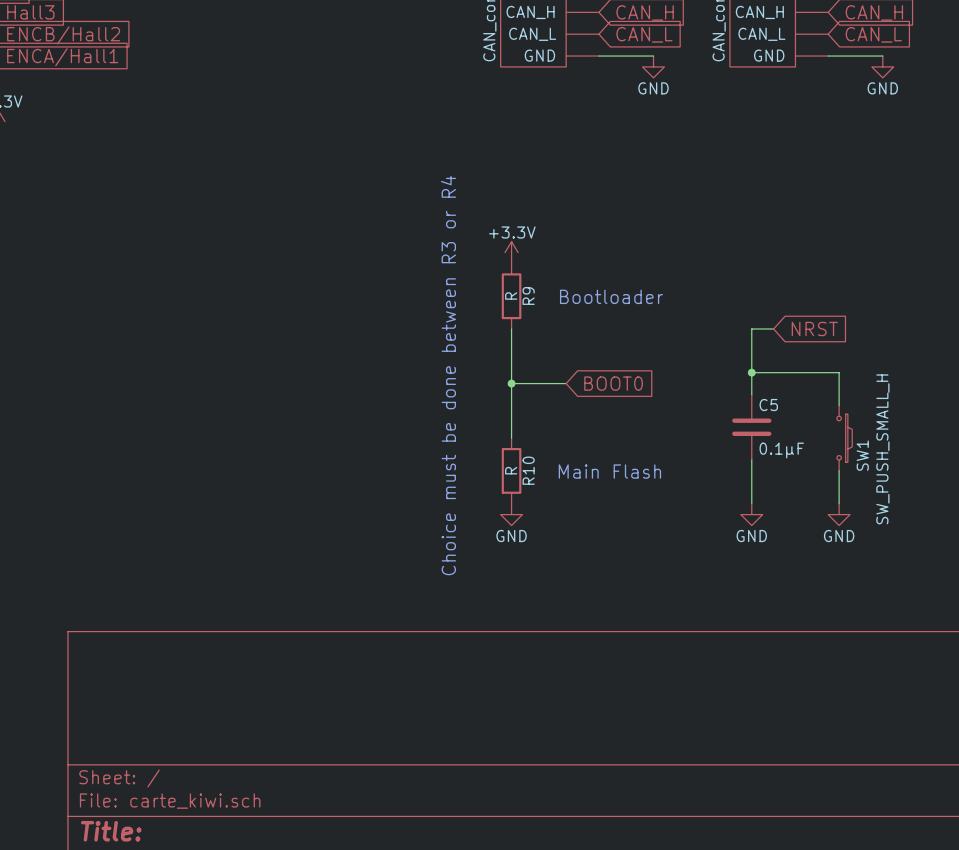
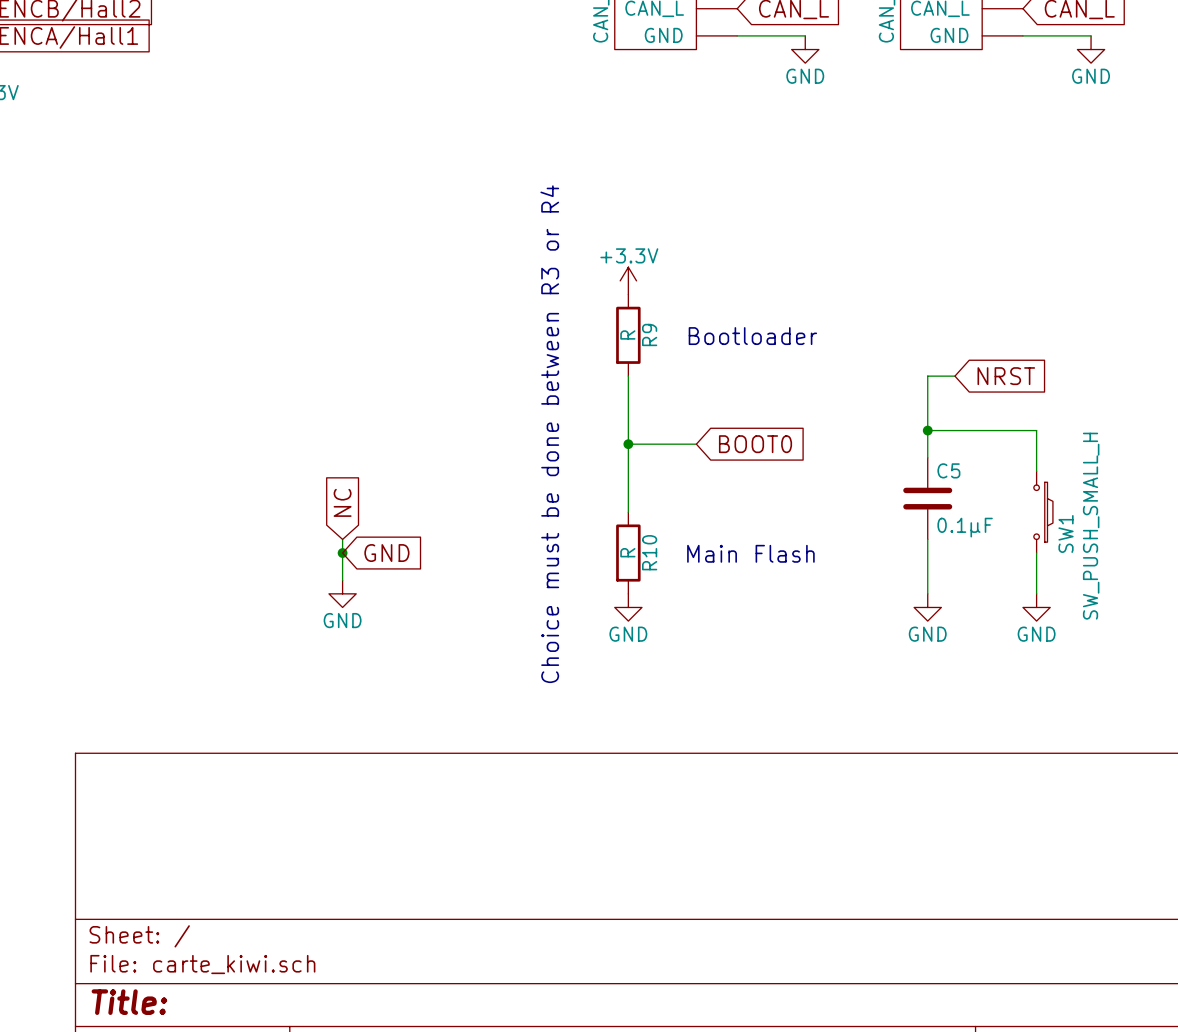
global label: none -> NC (342, 502)
wire: none -> (342, 539) (342, 580)
junction: none -> (342, 553)
global label: none -> GND (386, 553)
power symbol: none -> GND (342, 593)

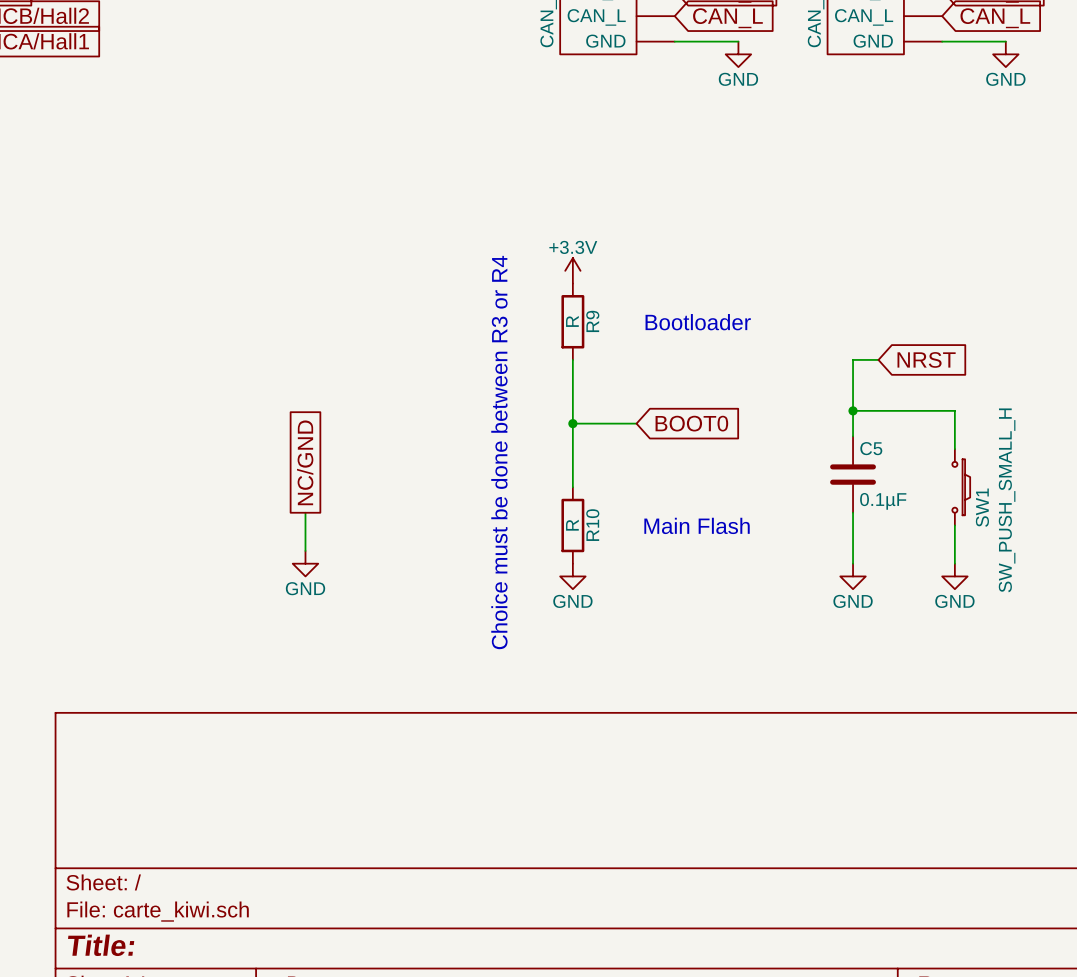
global label shape: input (342, 502) -> passive (305, 462)
global label: NC (342, 502) -> NC/GND (305, 462)
junction: (342, 553) -> none
global label: GND (386, 553) -> none

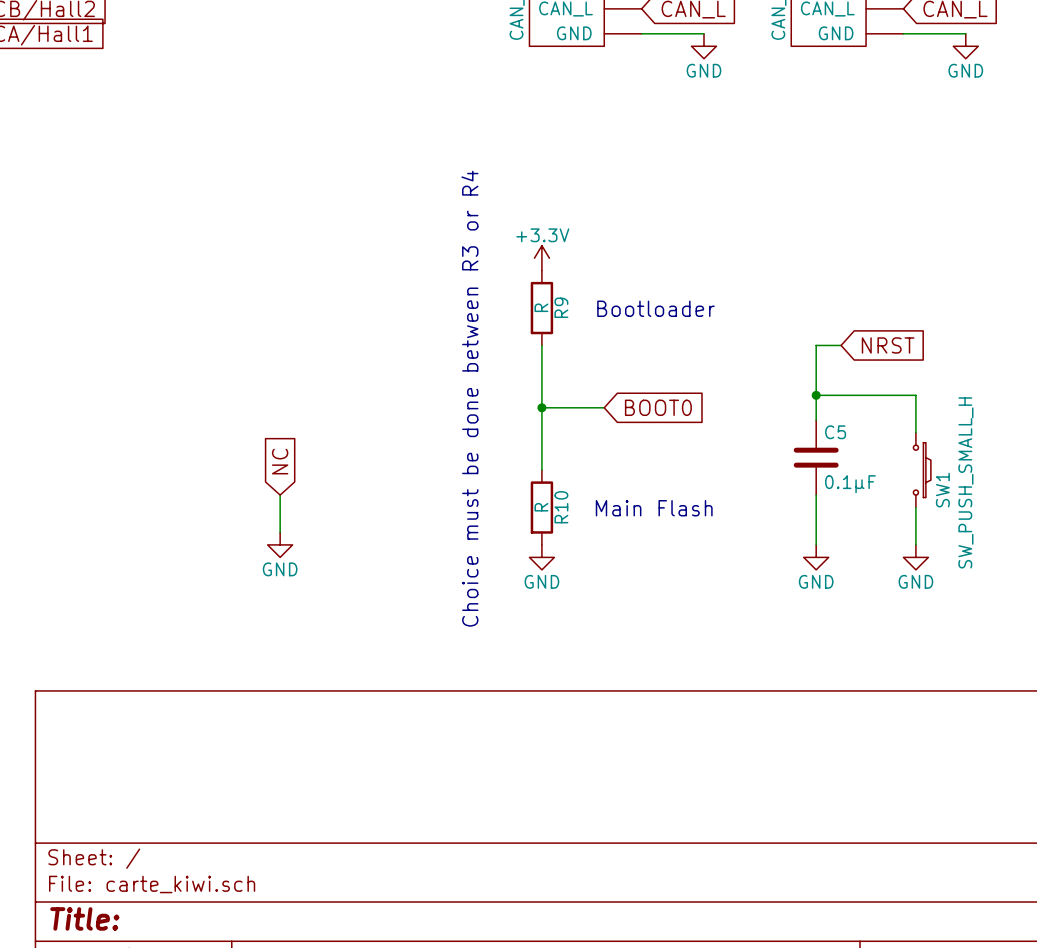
global label shape: passive (305, 462) -> input (280, 461)
global label: NC/GND (305, 462) -> NC (280, 461)

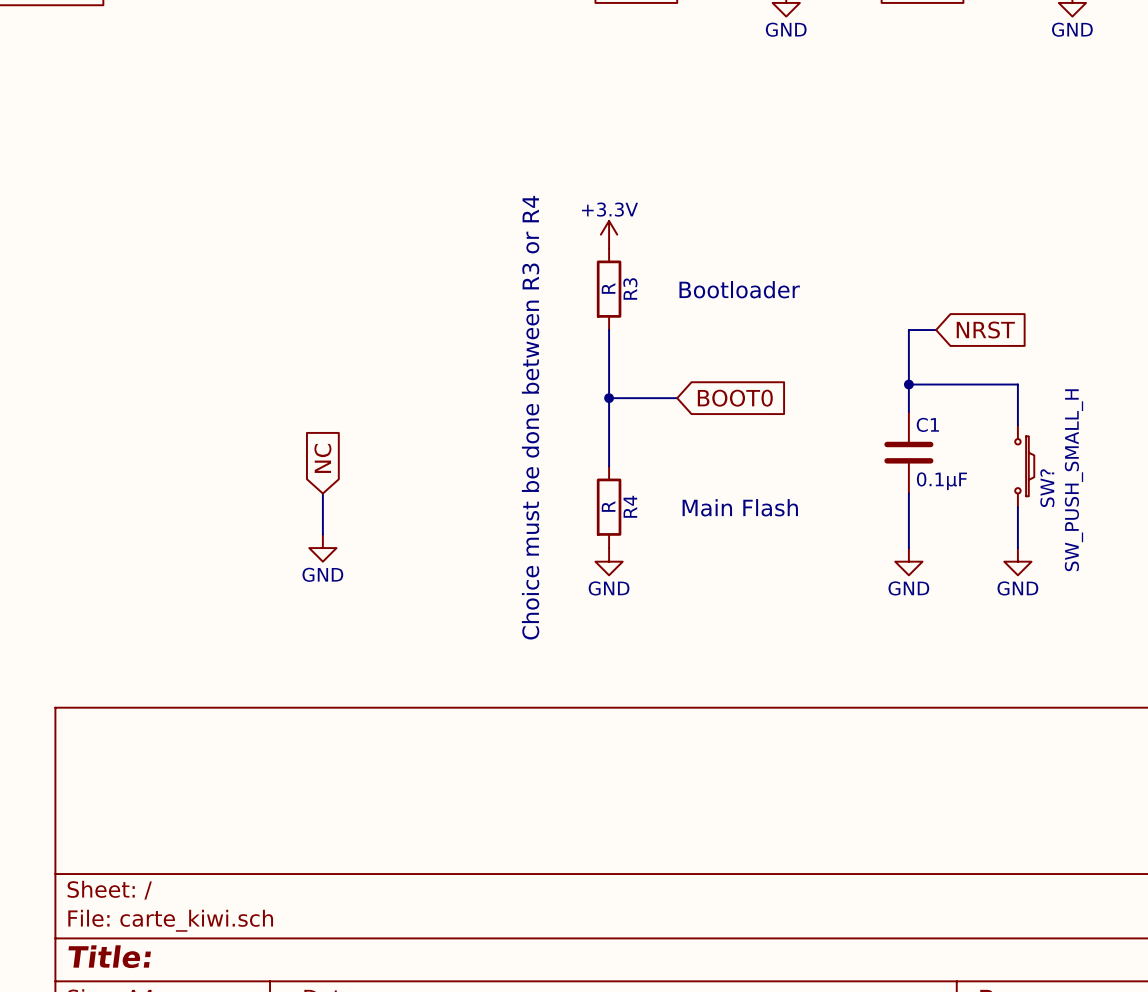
R9 name: R9 (561, 307) -> R3 (630, 288)
C5 name: C5 (835, 432) -> C1 (927, 424)
SW1 name: SW1 (942, 490) -> SW? (1047, 488)
R10 name: R10 (561, 507) -> R4 (630, 506)

